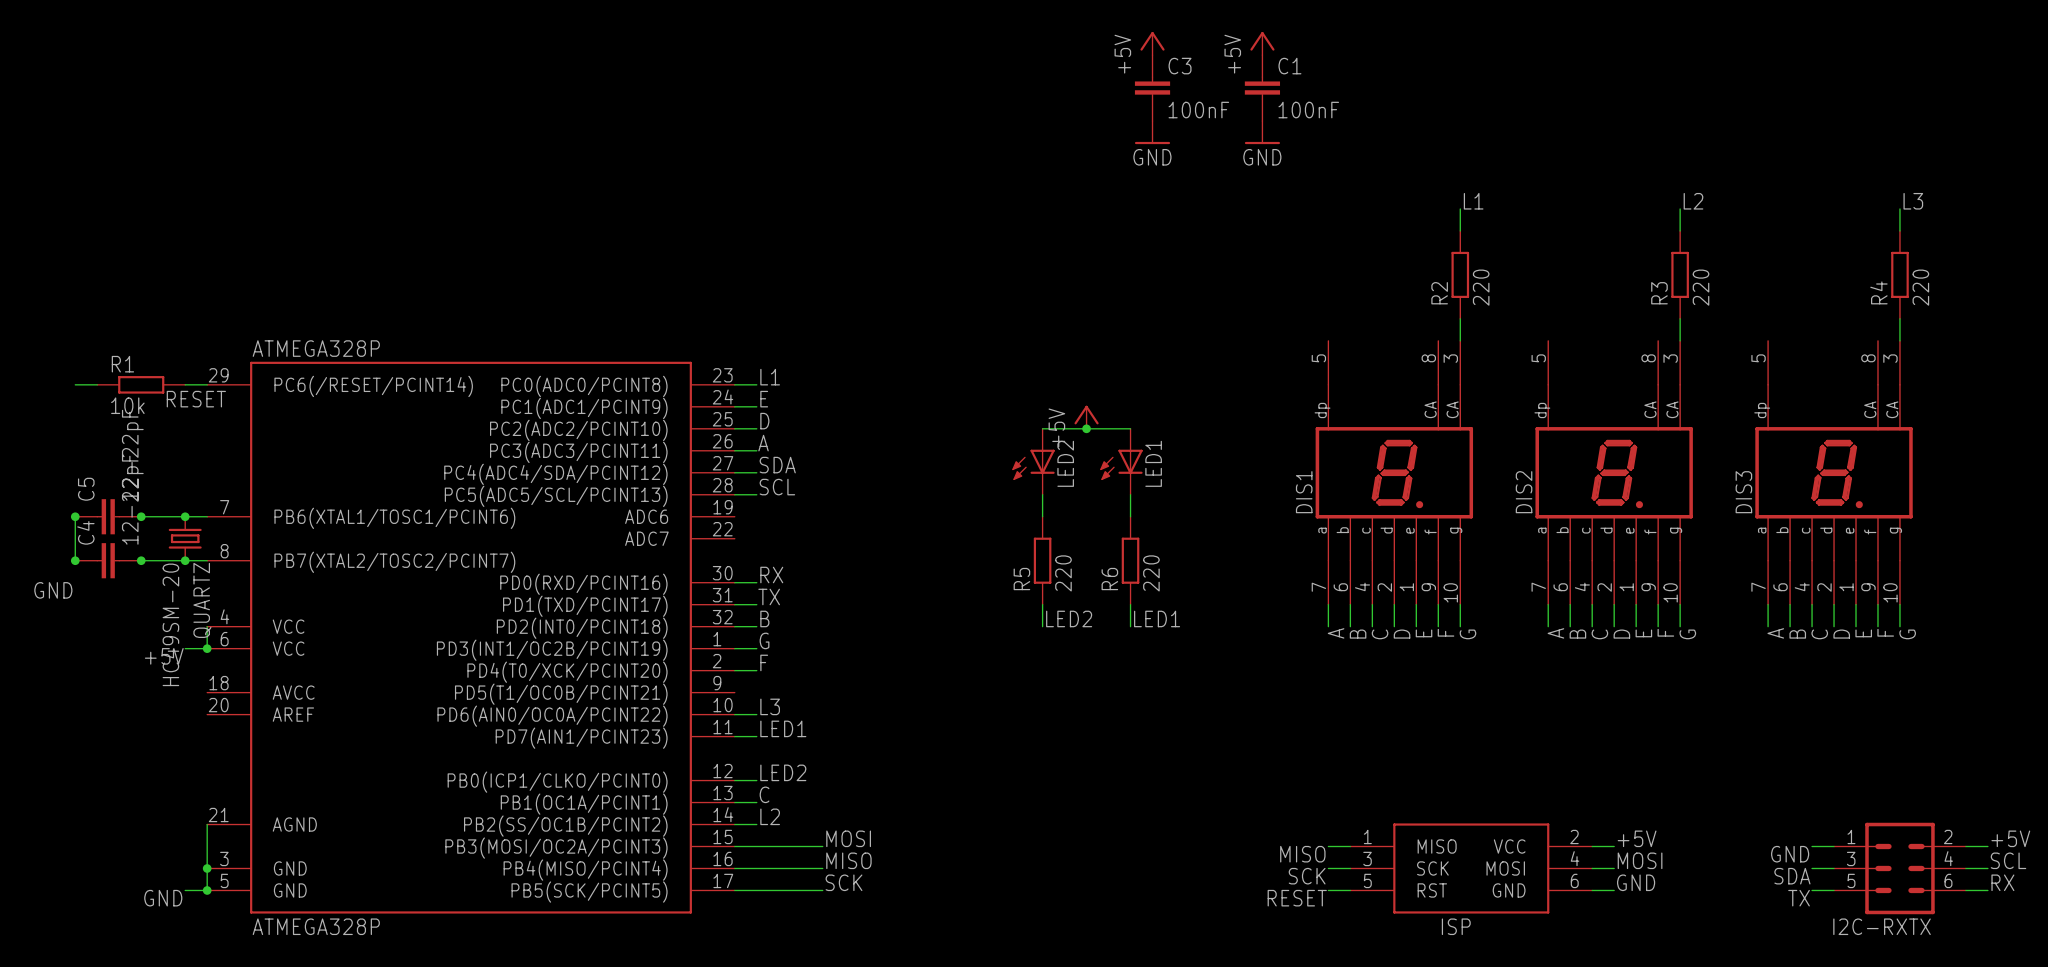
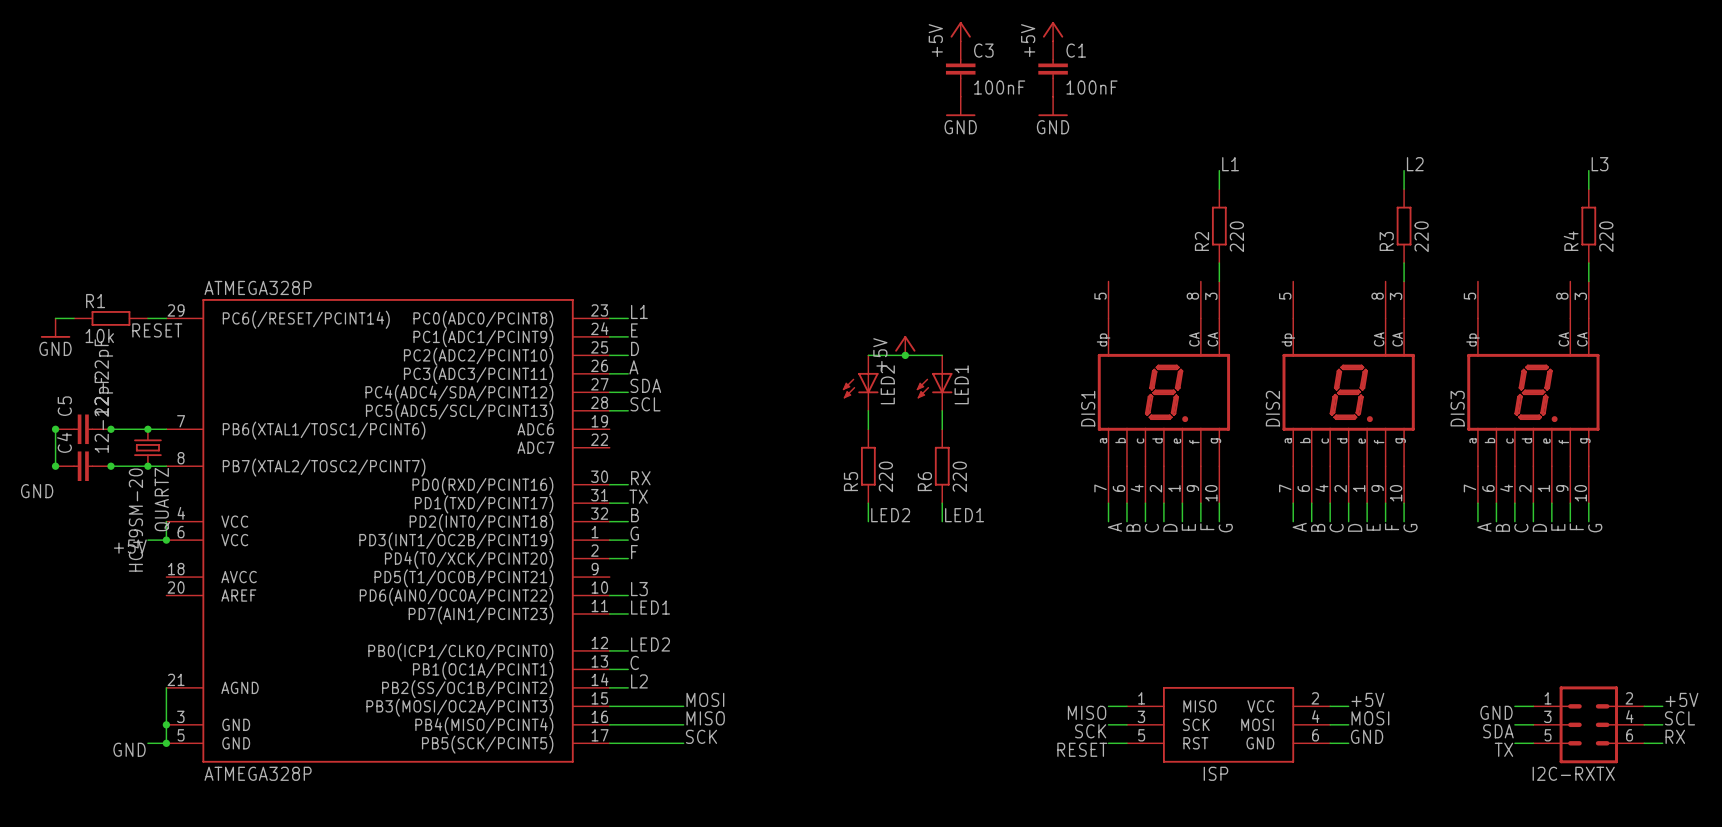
power symbol: none -> GND (55, 328)

